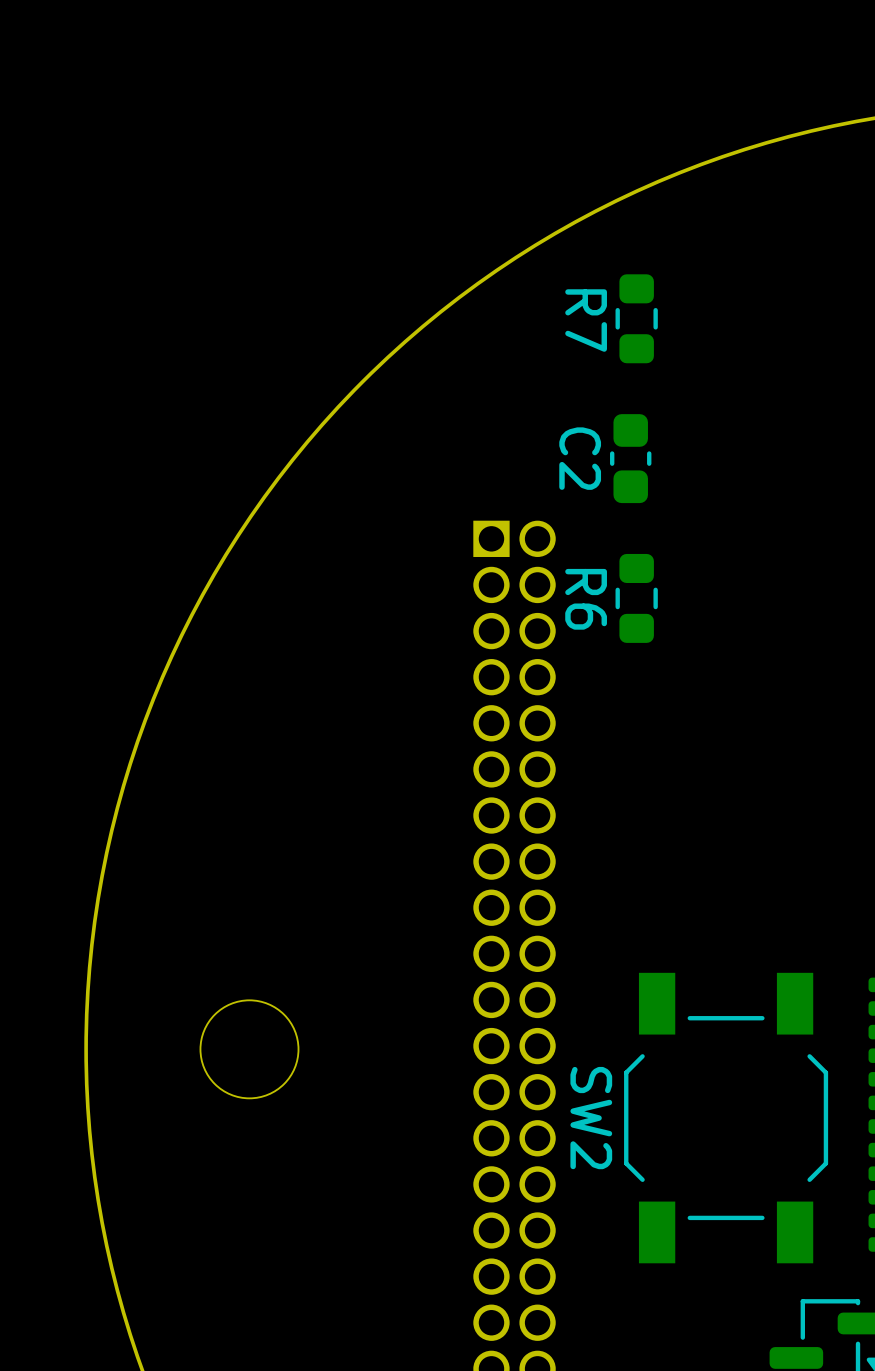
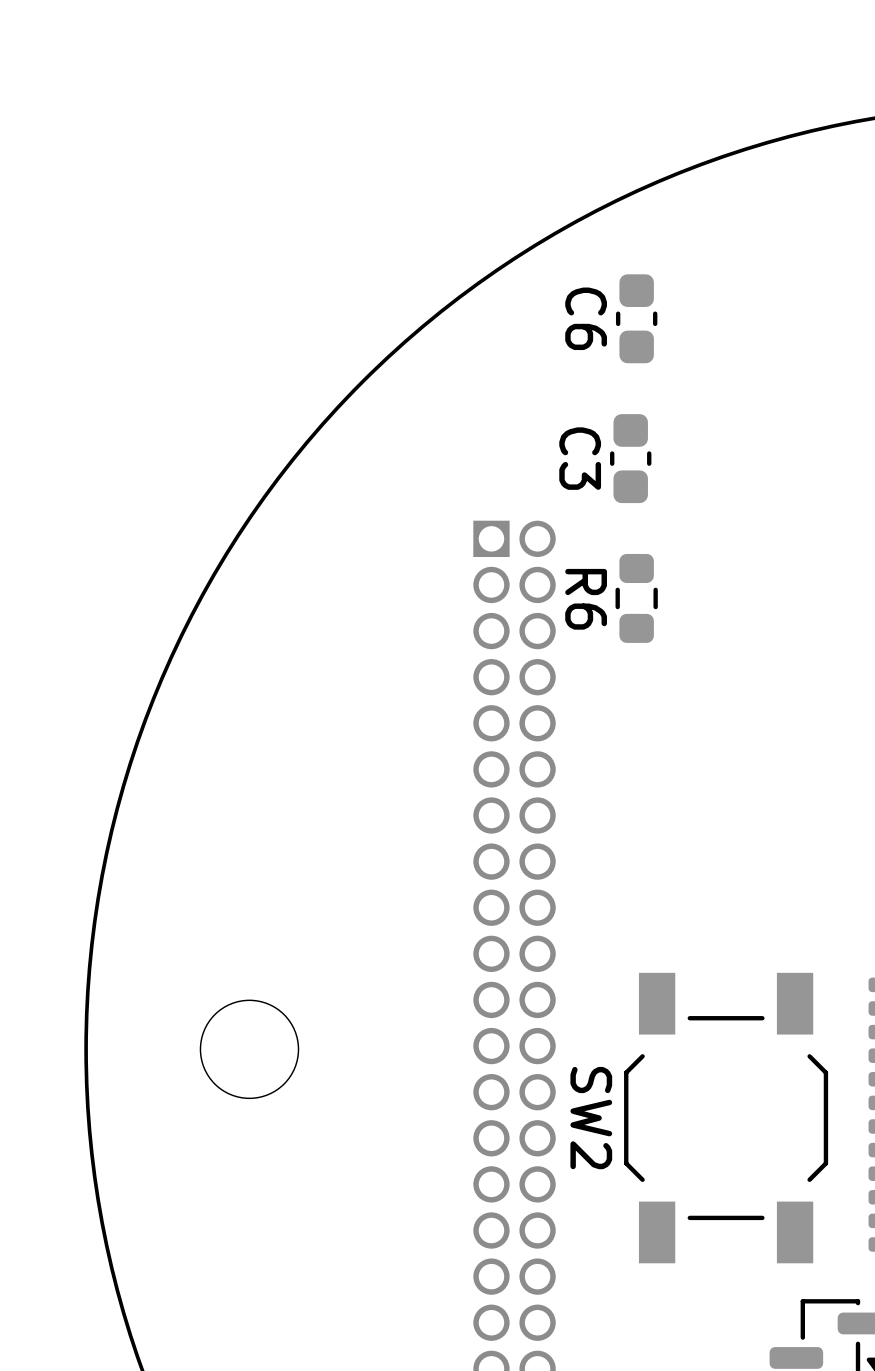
R7: (636, 318) -> none
C6: none -> (636, 318)
C2 name: C2 (580, 458) -> C3 (580, 458)

